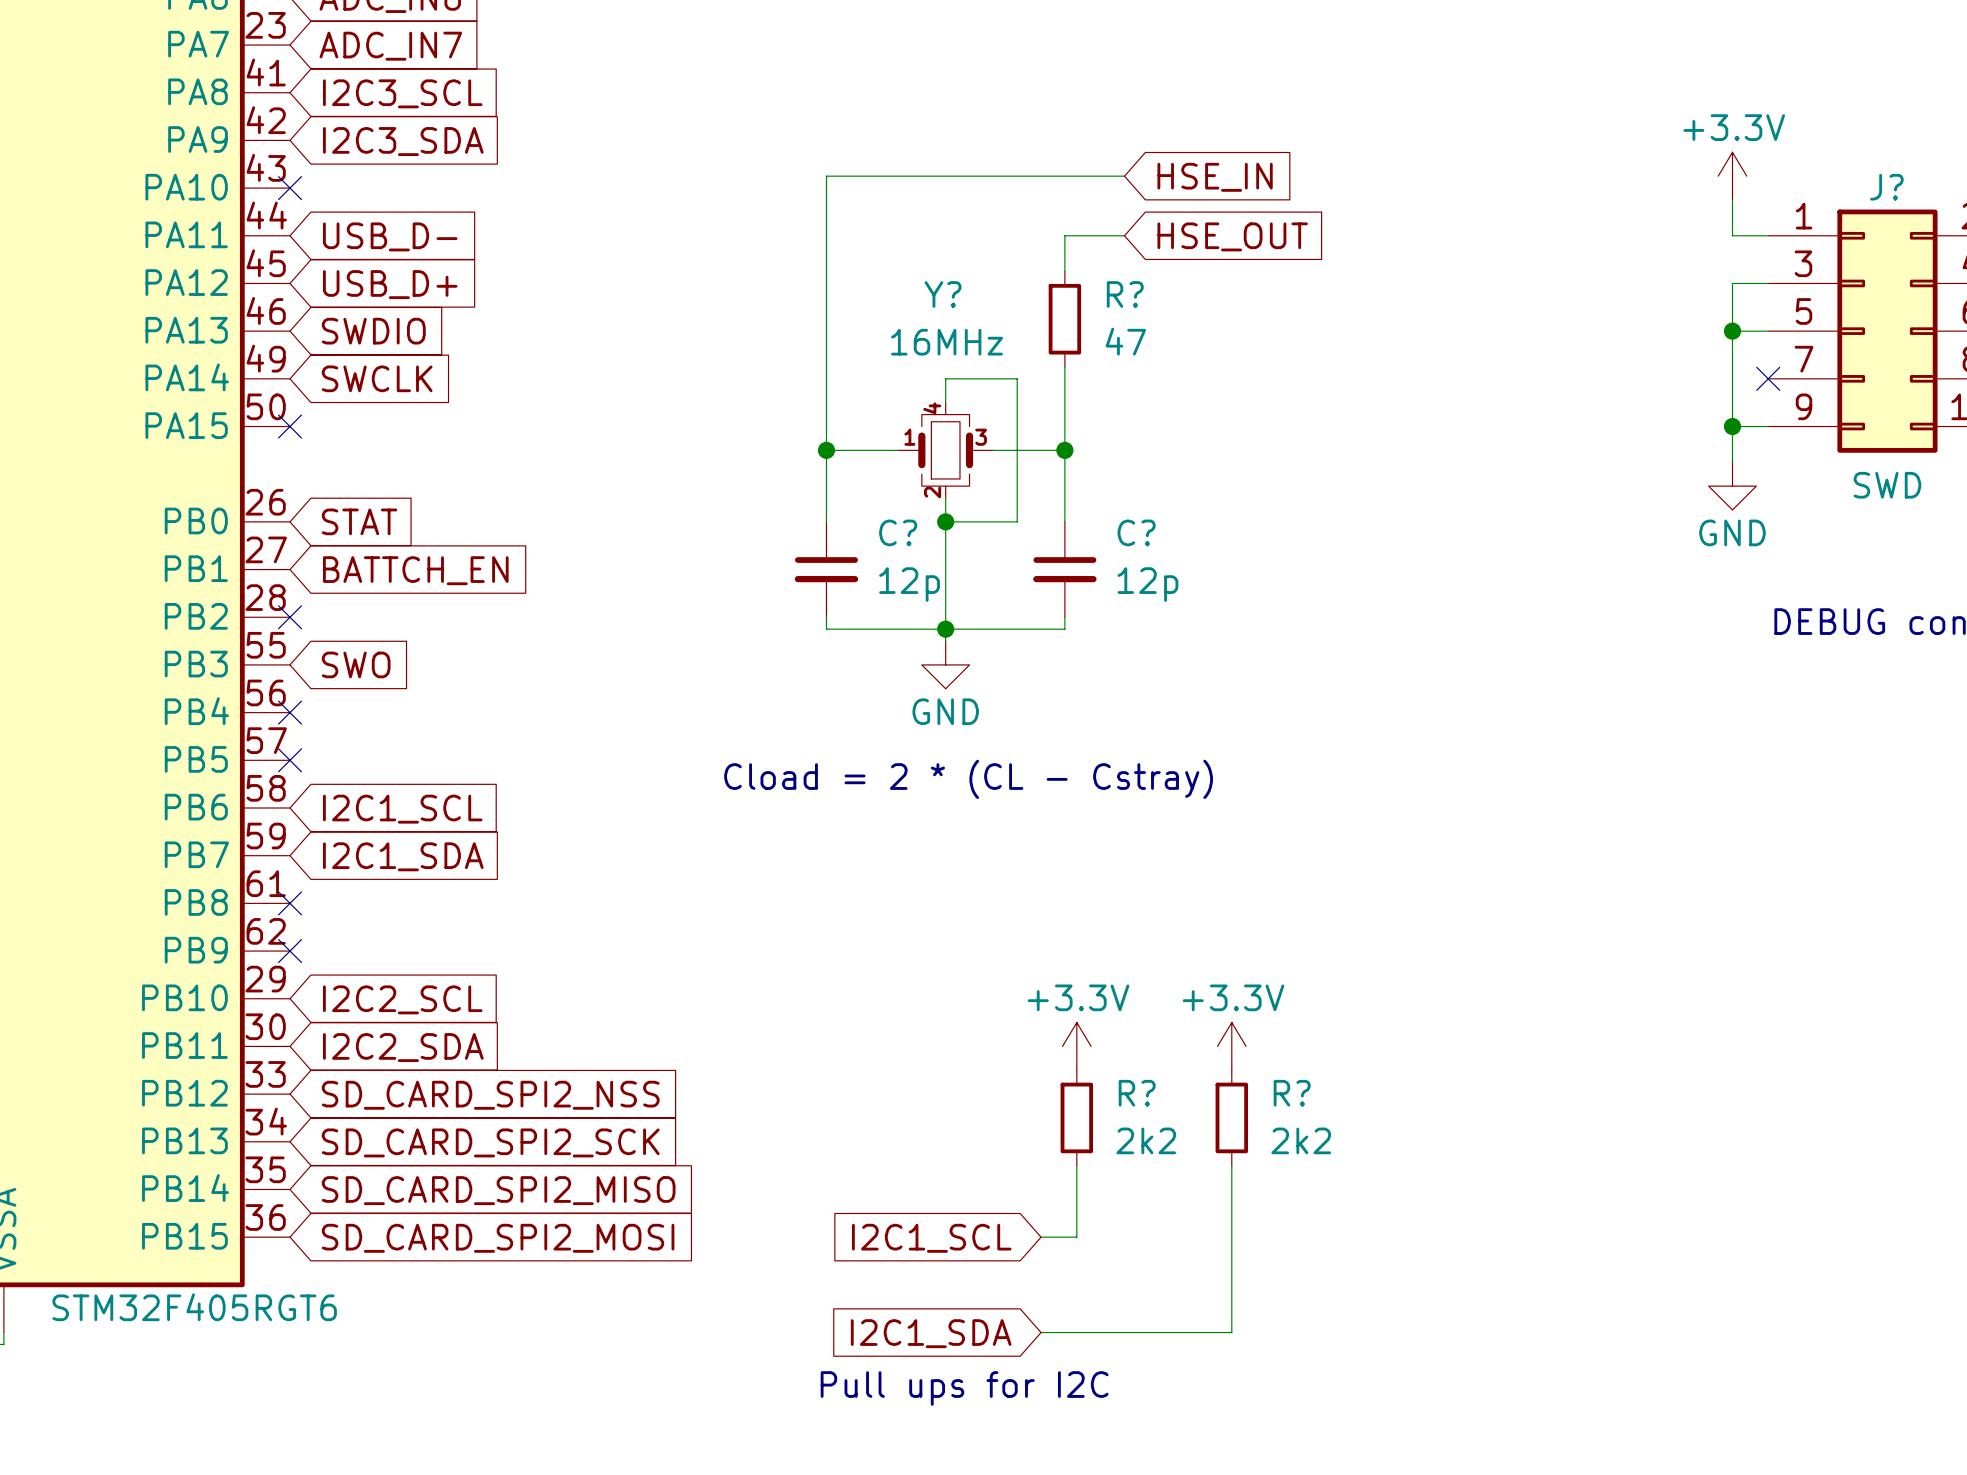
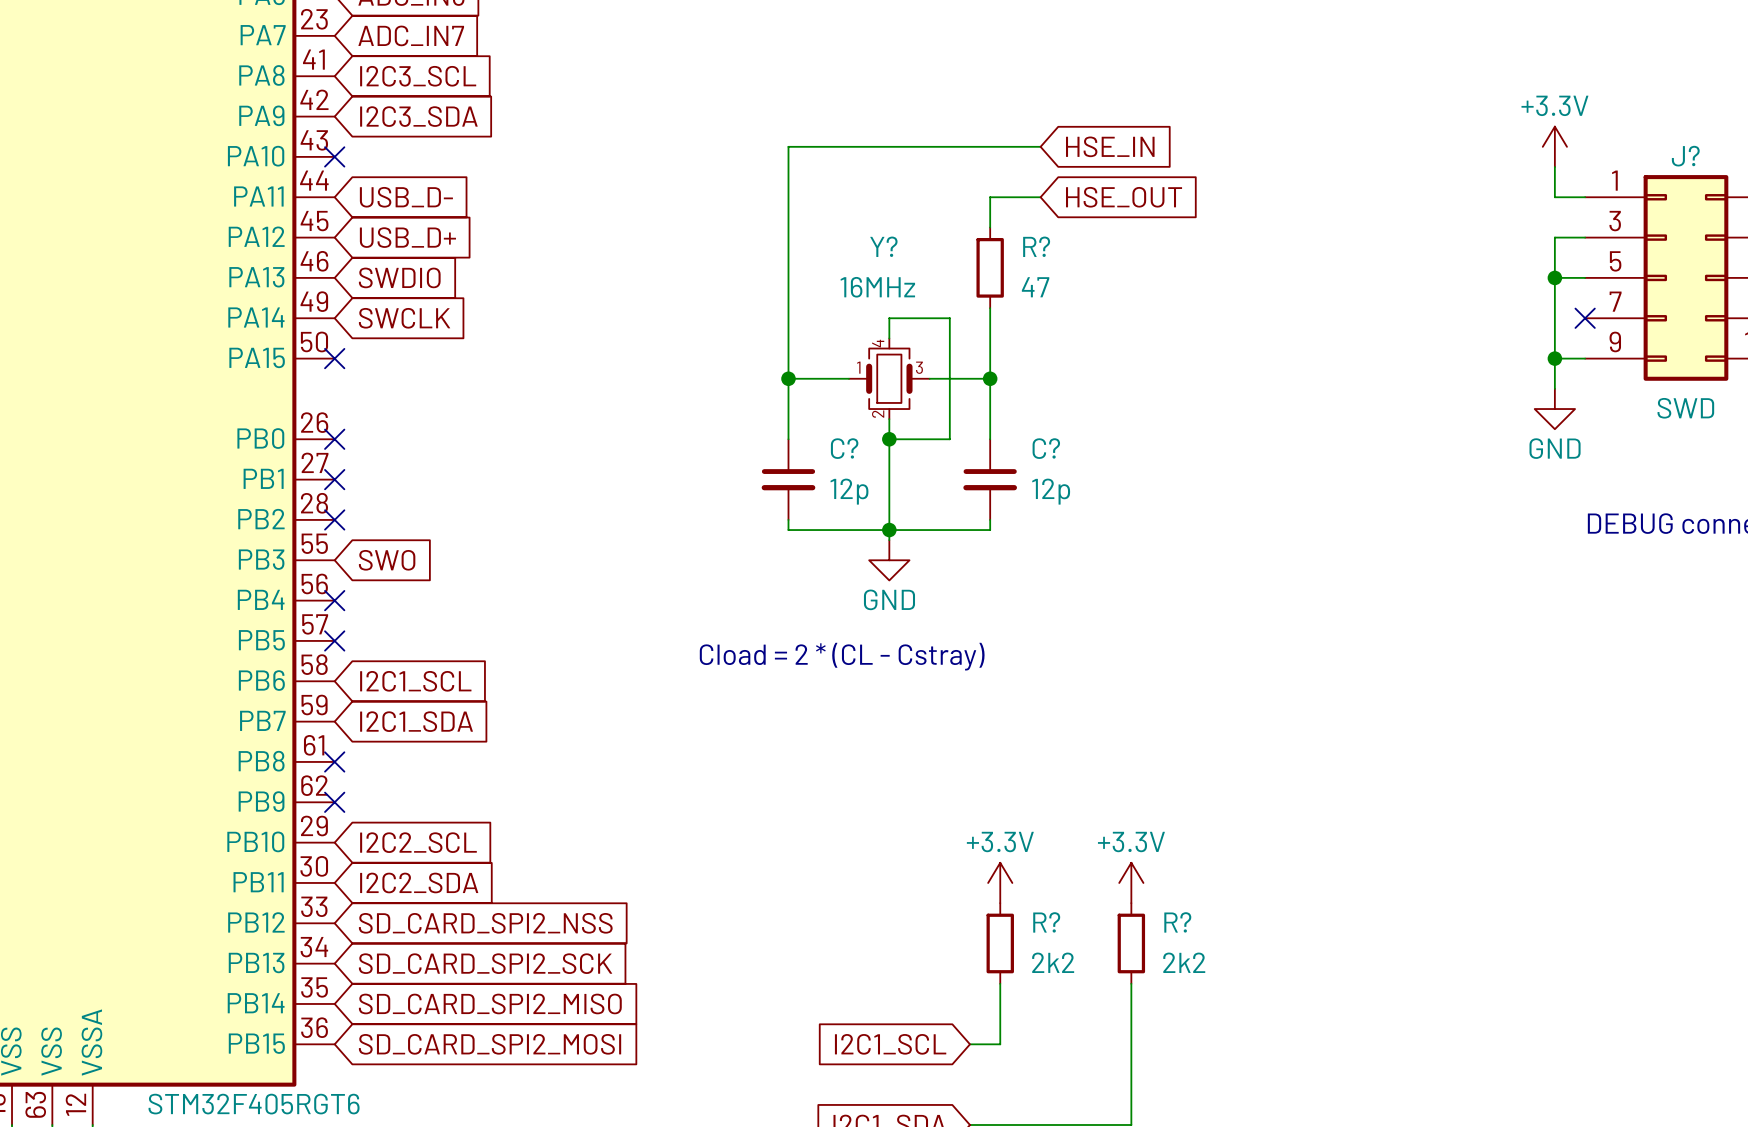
no-connect mark: none -> (334, 439)
global label: STAT (359, 521) -> none
no-connect mark: none -> (334, 479)
global label: BATTCH_EN (415, 570) -> none

